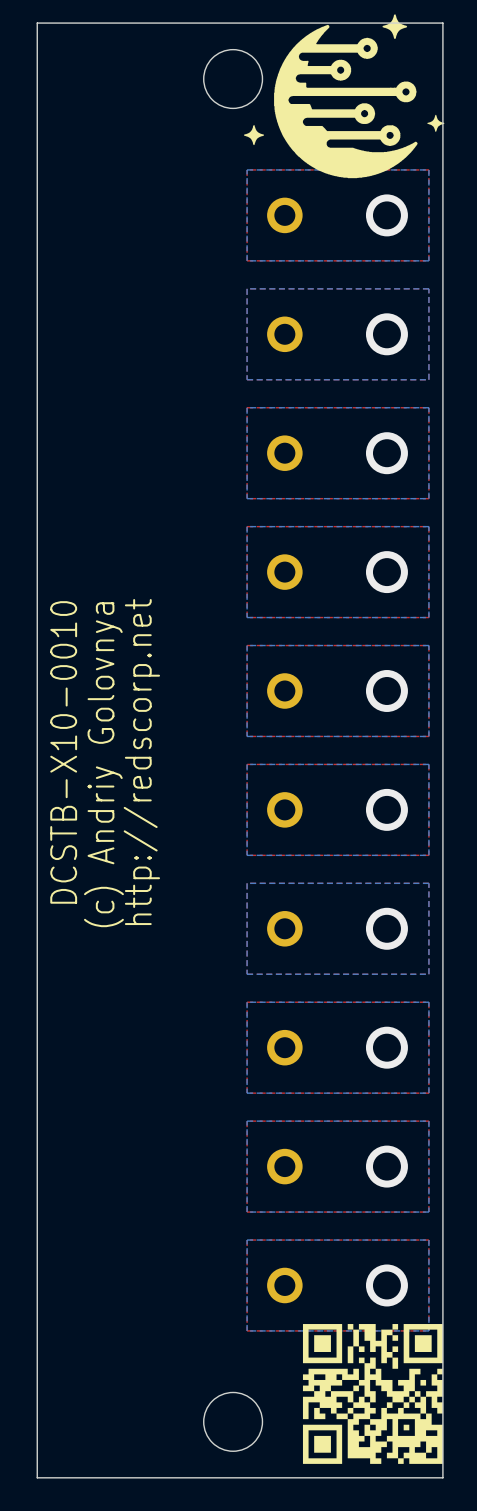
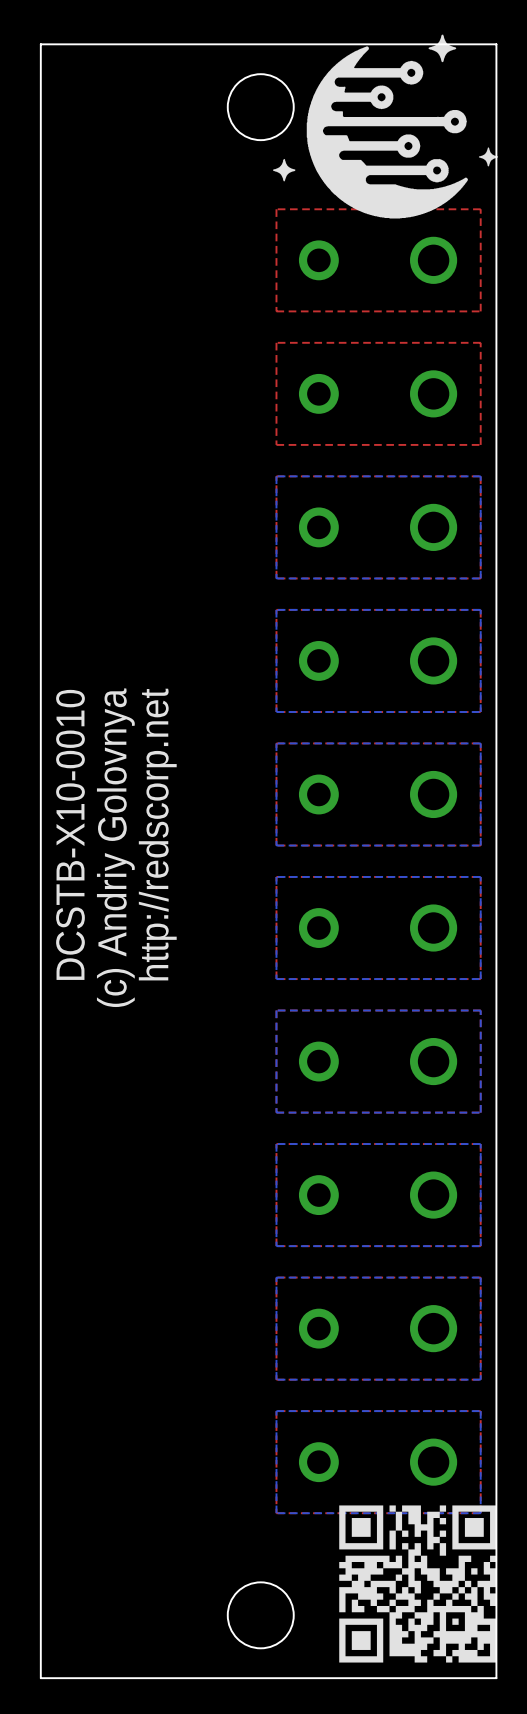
bottom zone outline: (428, 169) (428, 260) (247, 260) (247, 169) (428, 169) -> none
bottom zone outline: (428, 288) (428, 379) (247, 379) (247, 288) (428, 288) -> none

